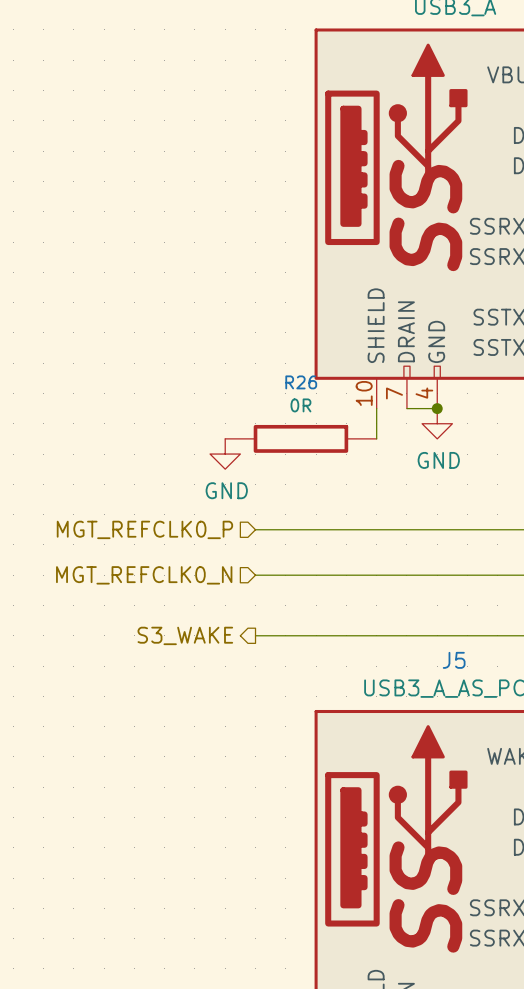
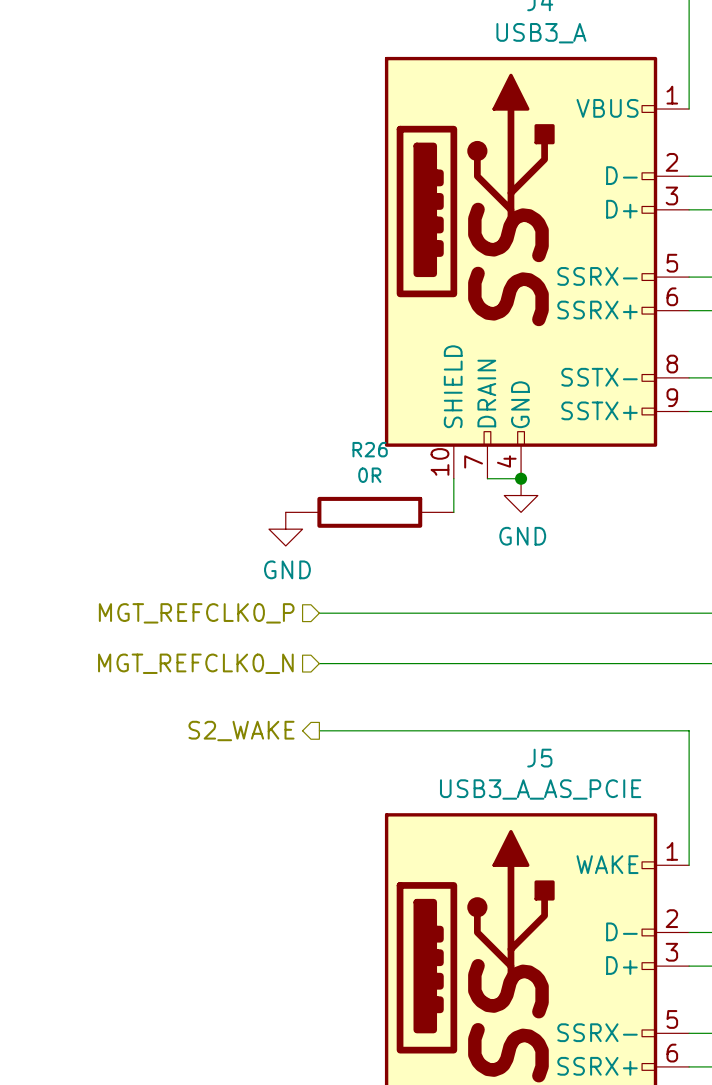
hierarchical label: S3_WAKE (185, 635) -> S2_WAKE (241, 730)

